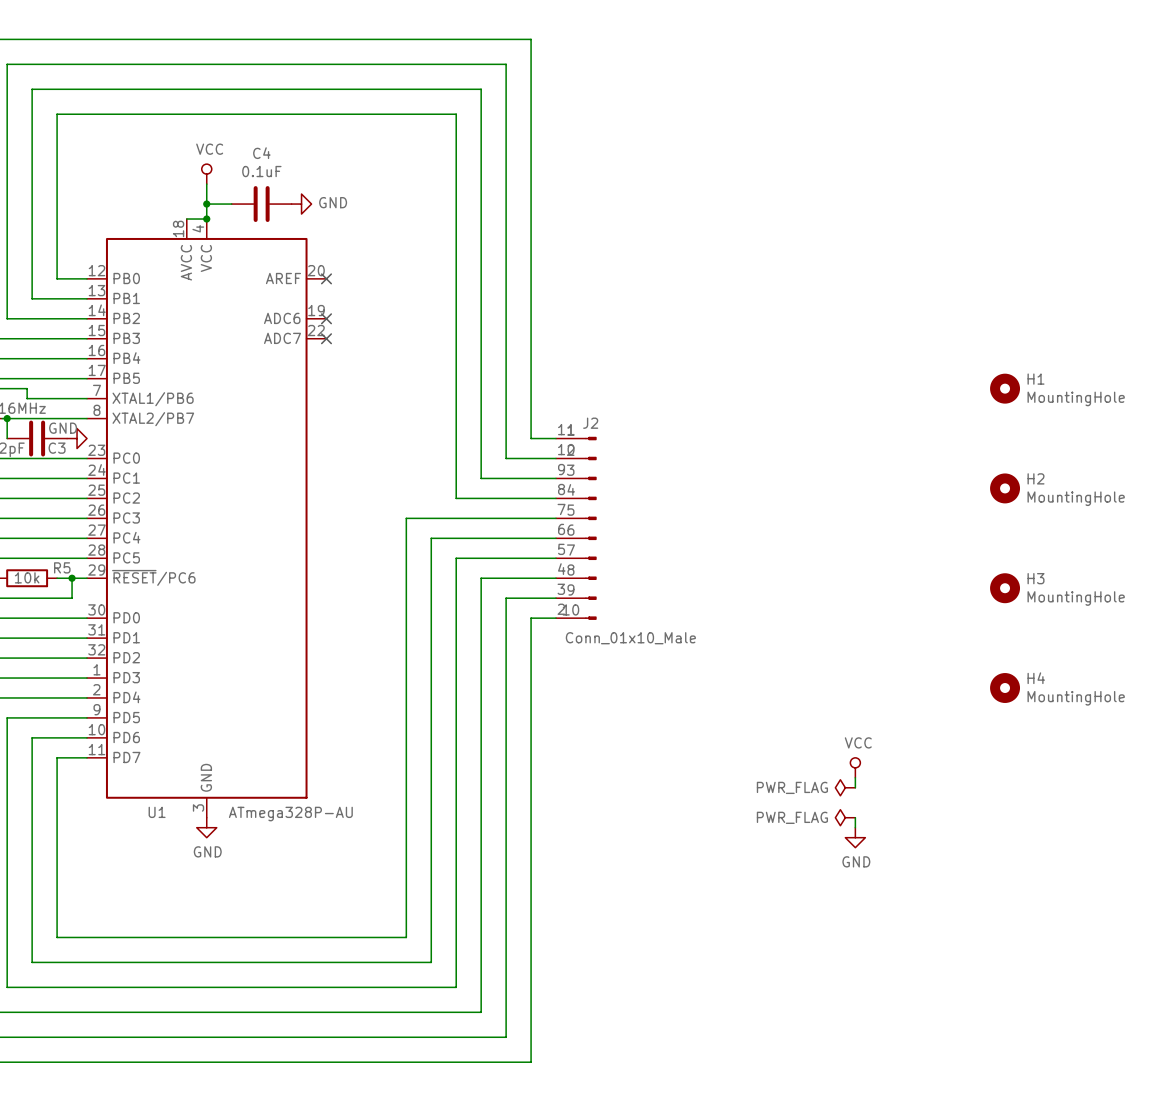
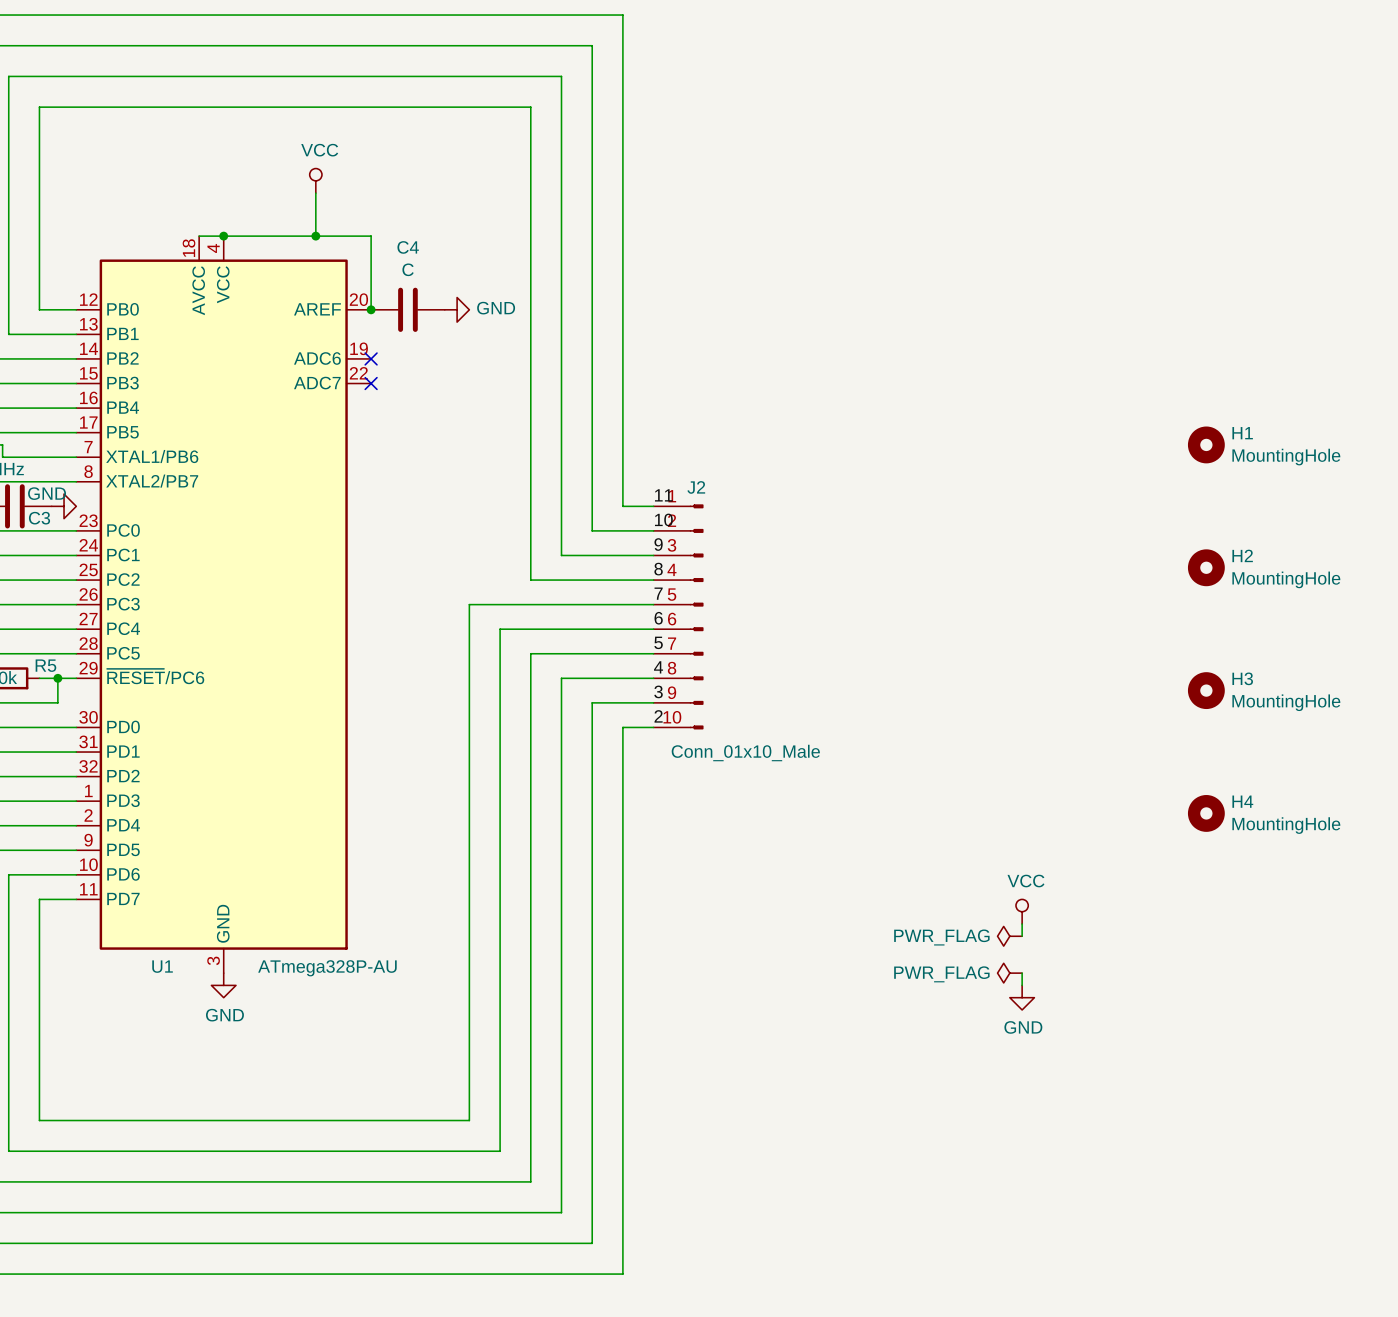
C4 value: 0.1uF (261, 171) -> C (408, 269)
power symbol position: VCC (206, 174) -> VCC (315, 180)
wire: (206, 184) (206, 219) -> (371, 309) (371, 236) (223, 236)
wire: none -> (315, 193) (315, 236)
wire: (206, 204) (231, 204) -> none
junction: (206, 204) -> none
C4 position: (261, 204) -> (407, 309)
power symbol position: GND (301, 204) -> GND (457, 309)
junction: none -> (315, 236)
junction: none -> (371, 309)
no-connect mark: (326, 278) -> none

